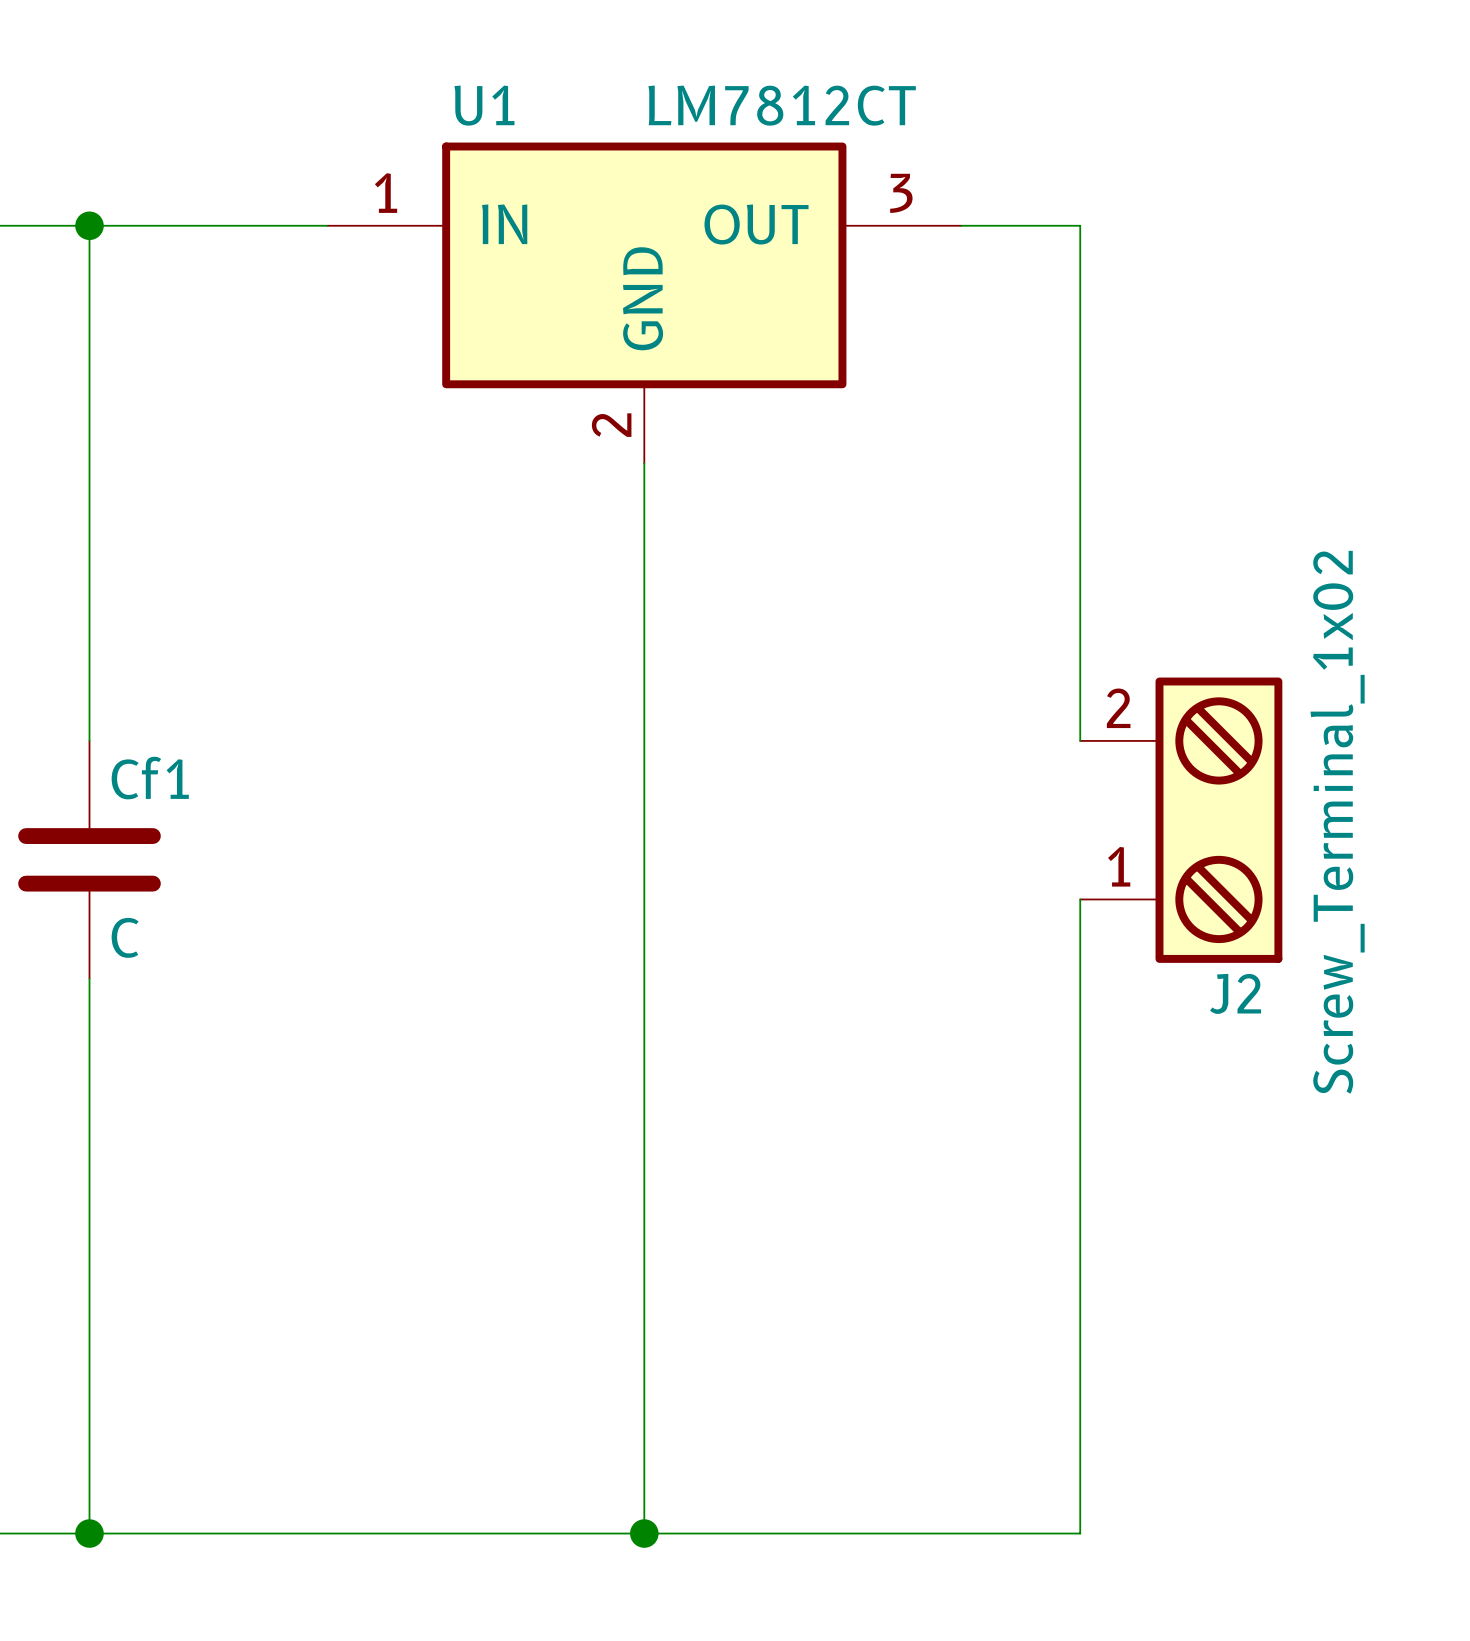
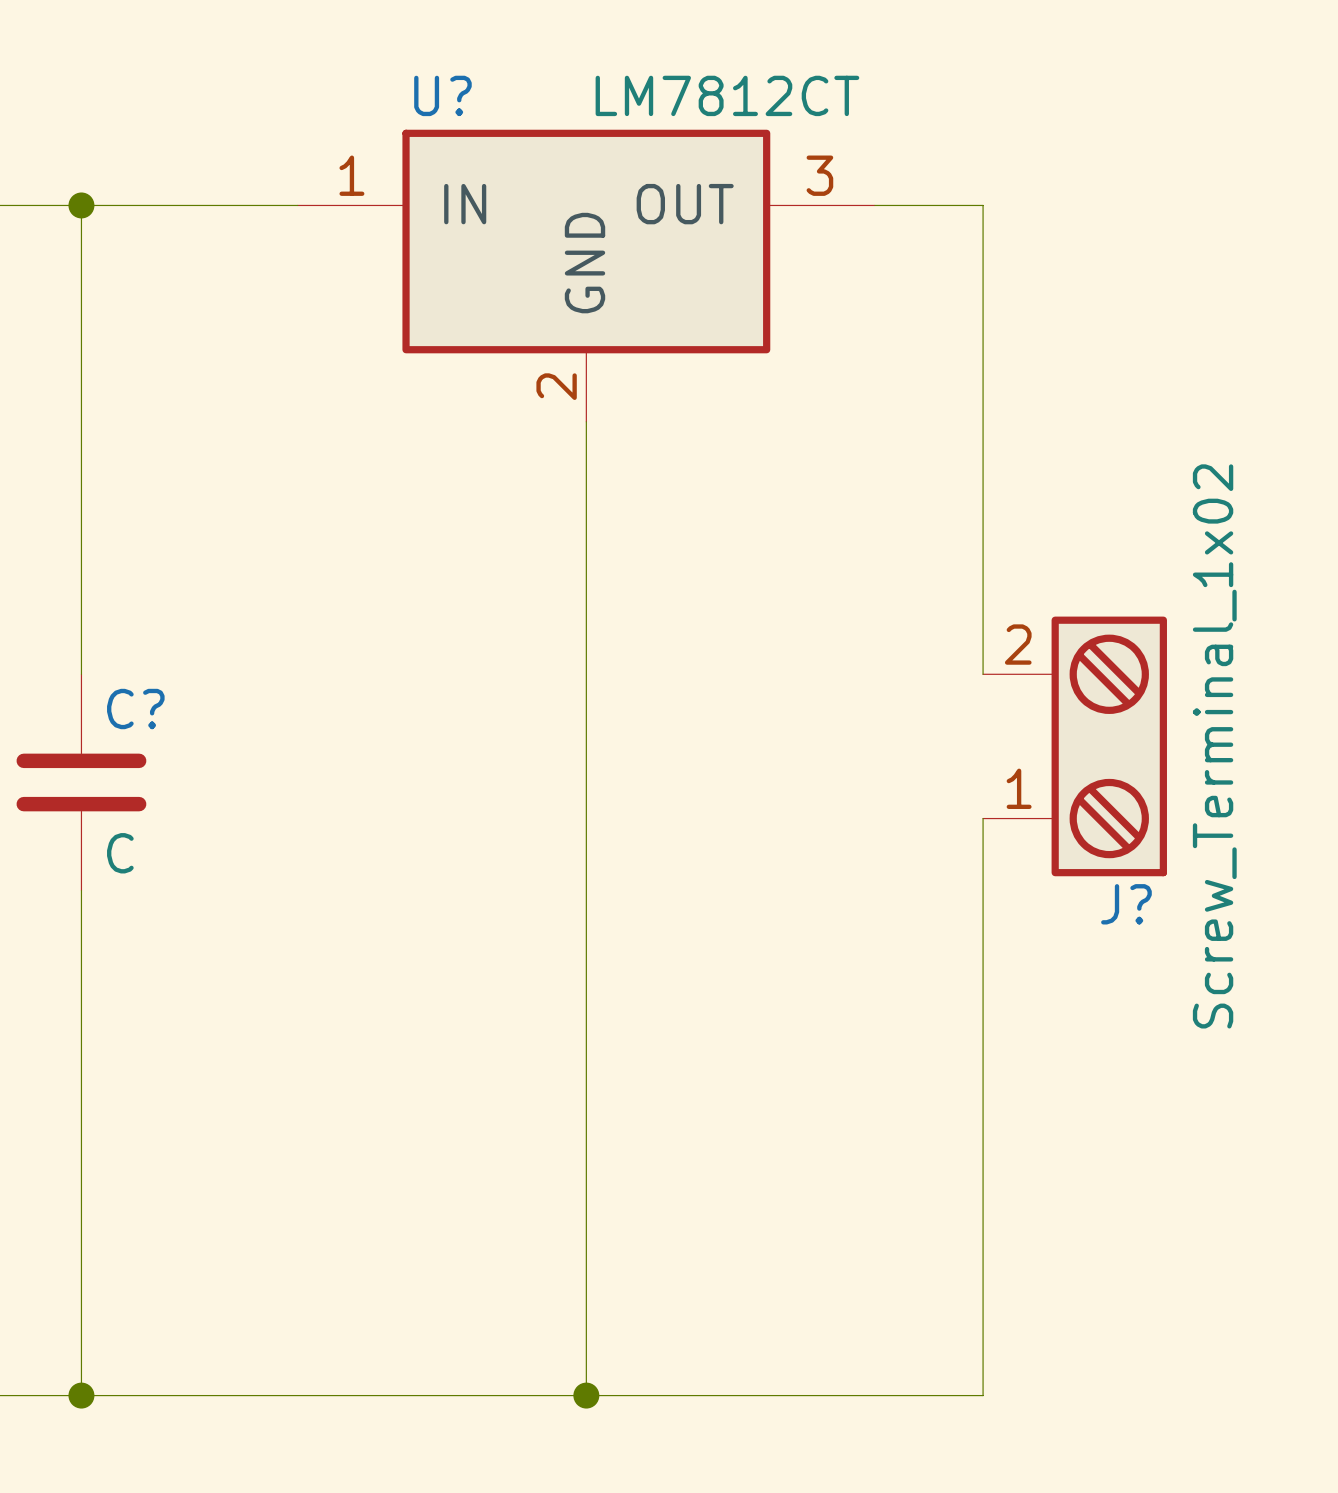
U1 name: U1 (484, 105) -> U? (442, 95)
Cf1 name: Cf1 (150, 778) -> C? (135, 709)
J2 name: J2 (1235, 993) -> J? (1126, 904)

